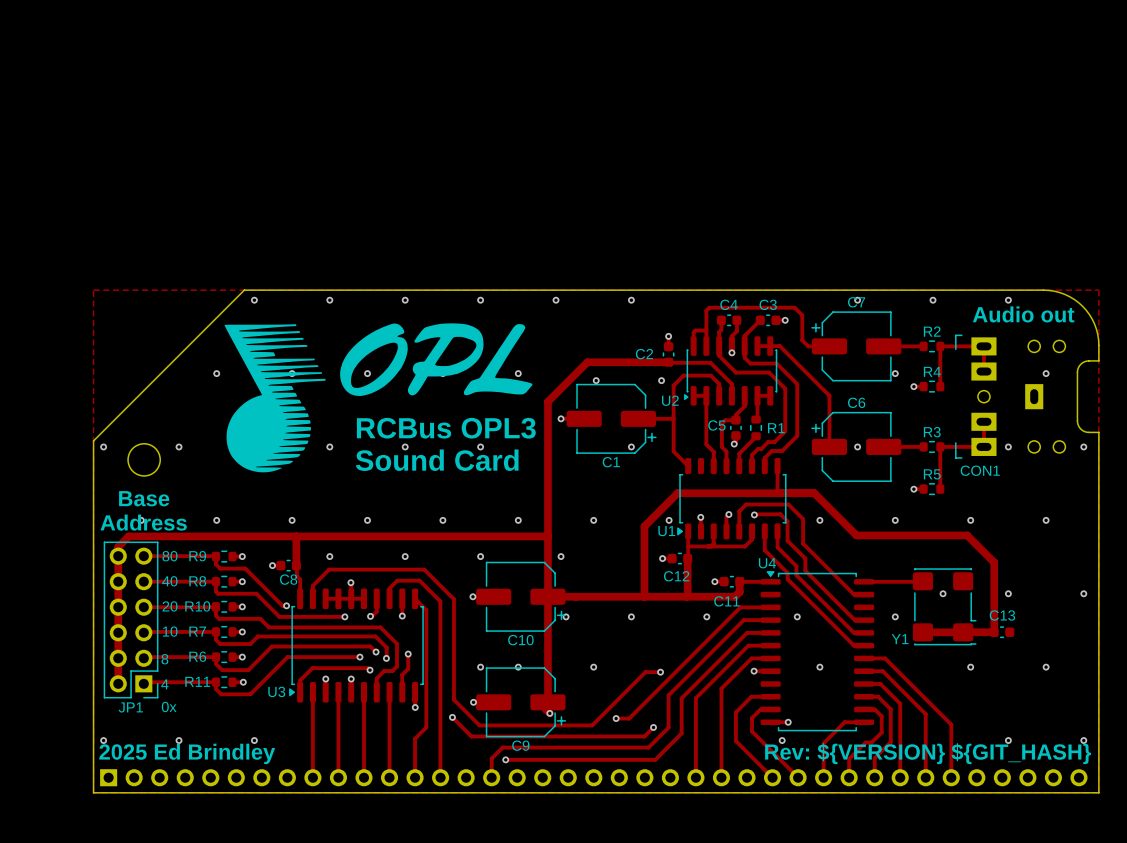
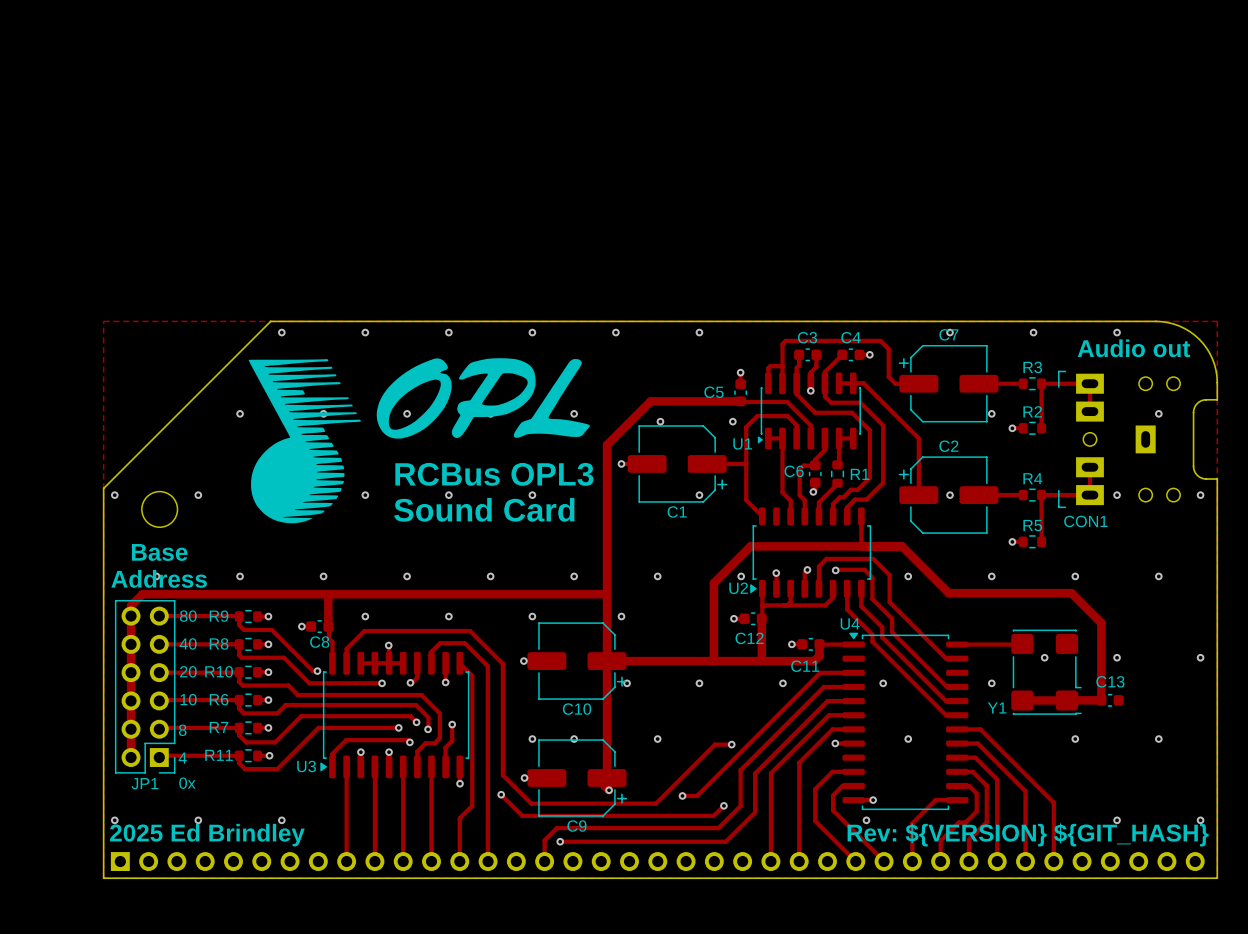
C4 name: C4 (729, 304) -> C3 (807, 337)
C3 name: C3 (768, 304) -> C4 (851, 337)
R2 name: R2 (932, 331) -> R3 (1032, 367)
C2 name: C2 (644, 354) -> C5 (713, 392)
R4 name: R4 (932, 371) -> R2 (1032, 411)
U2 name: U2 (670, 400) -> U1 (742, 443)
C6 name: C6 (856, 402) -> C2 (948, 446)
C5 name: C5 (716, 425) -> C6 (794, 471)
R3 name: R3 (932, 432) -> R4 (1032, 478)
U1 name: U1 (666, 531) -> U2 (738, 588)
R7 name: R7 (197, 631) -> R6 (219, 699)
R6 name: R6 (197, 656) -> R7 (219, 727)

